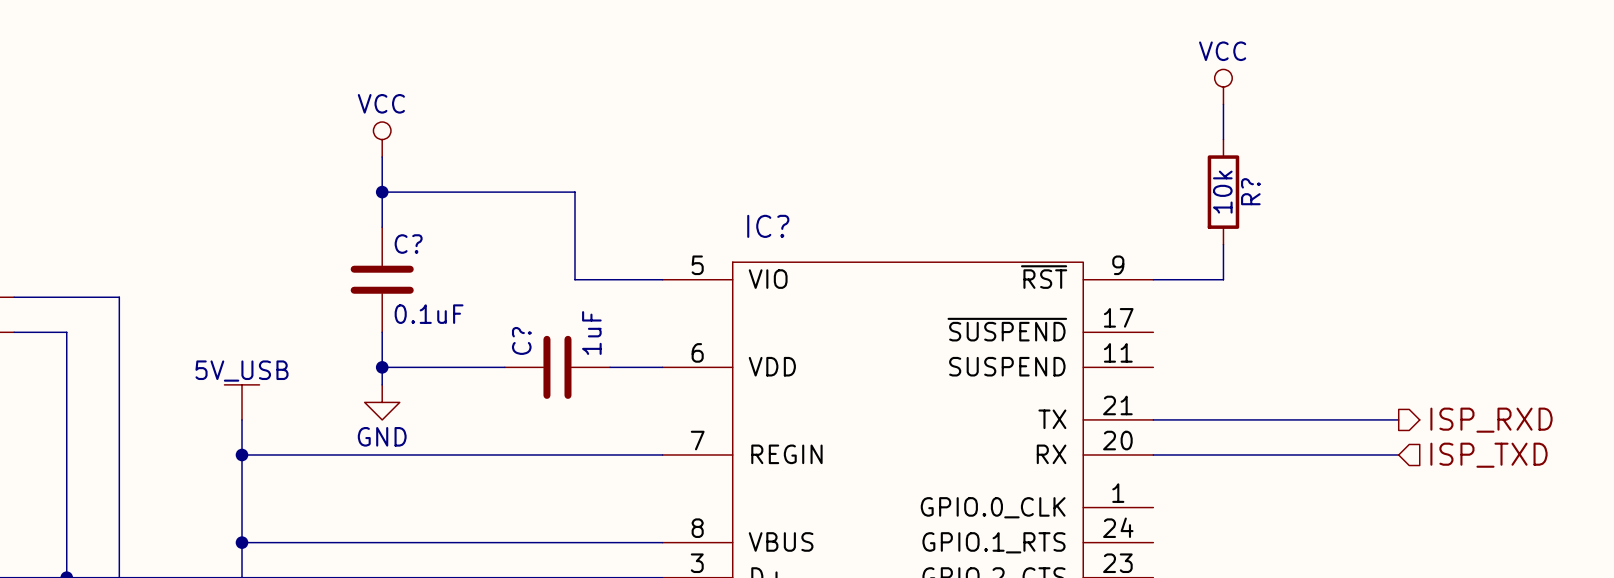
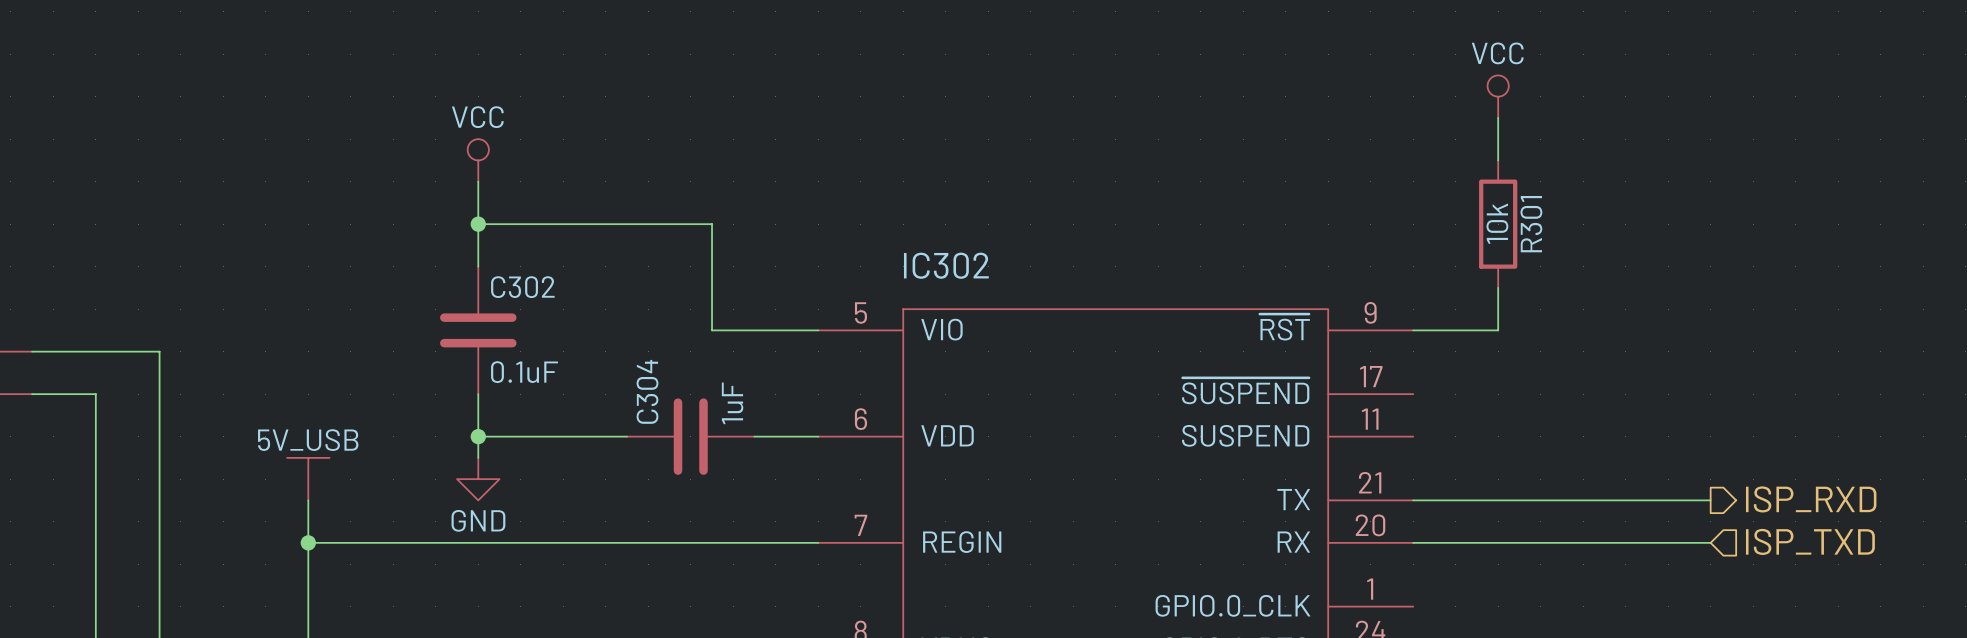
R? name: R? (1250, 191) -> R301 (1531, 224)
IC? name: IC? (768, 226) -> IC302 (946, 265)
C? name: C? (408, 244) -> C302 (522, 287)
C? name: C? (521, 340) -> C304 (647, 391)

